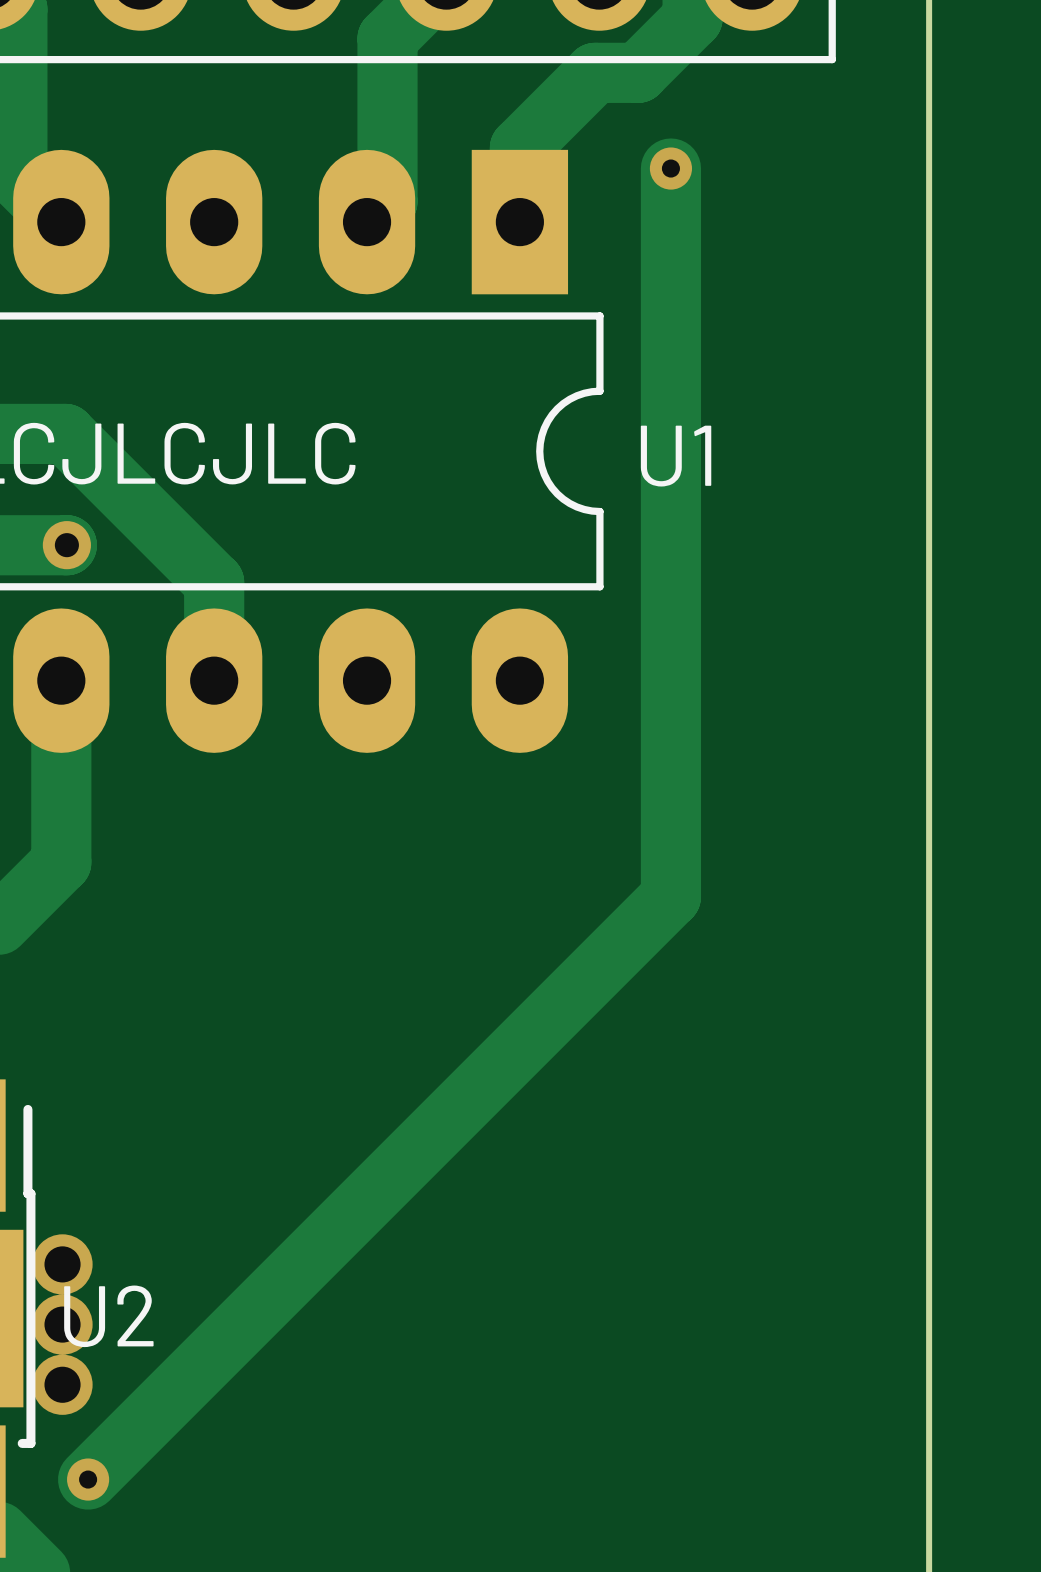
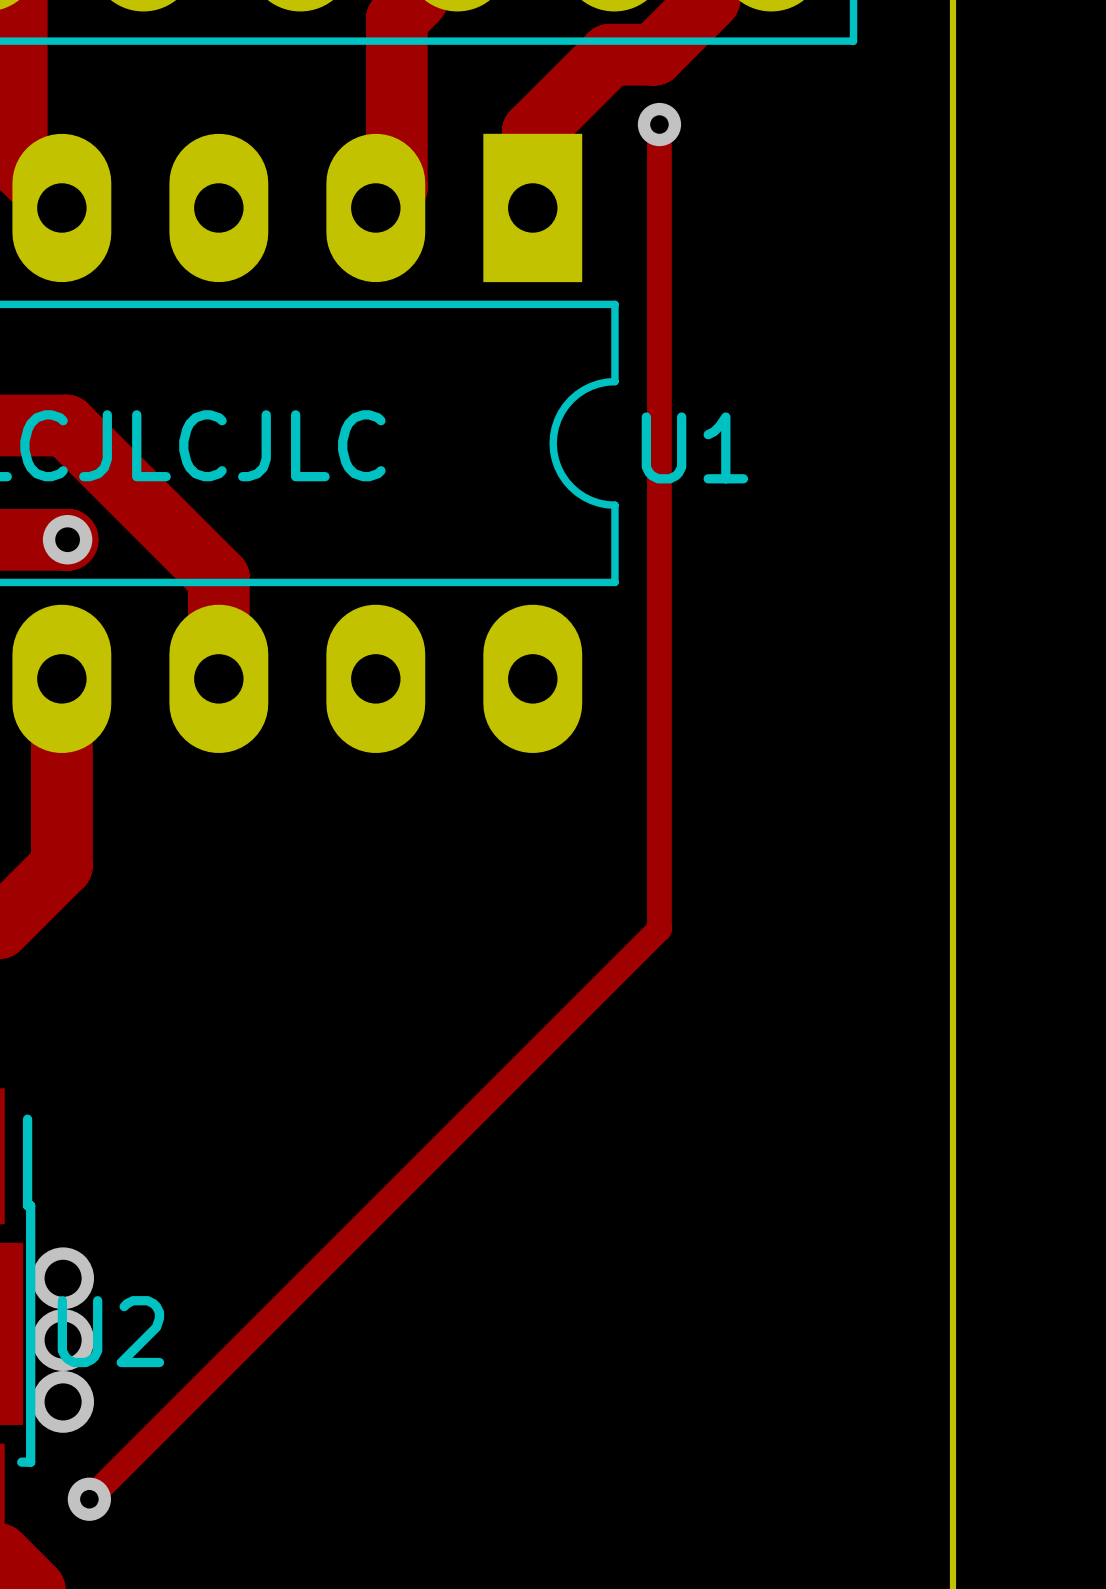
track: (670, 168) (670, 896) (643, 924) -> (659, 124) (659, 929)
via position: (670, 168) -> (659, 124)
track width: thick (643, 924) (88, 1479) -> thin (659, 929) (89, 1499)

